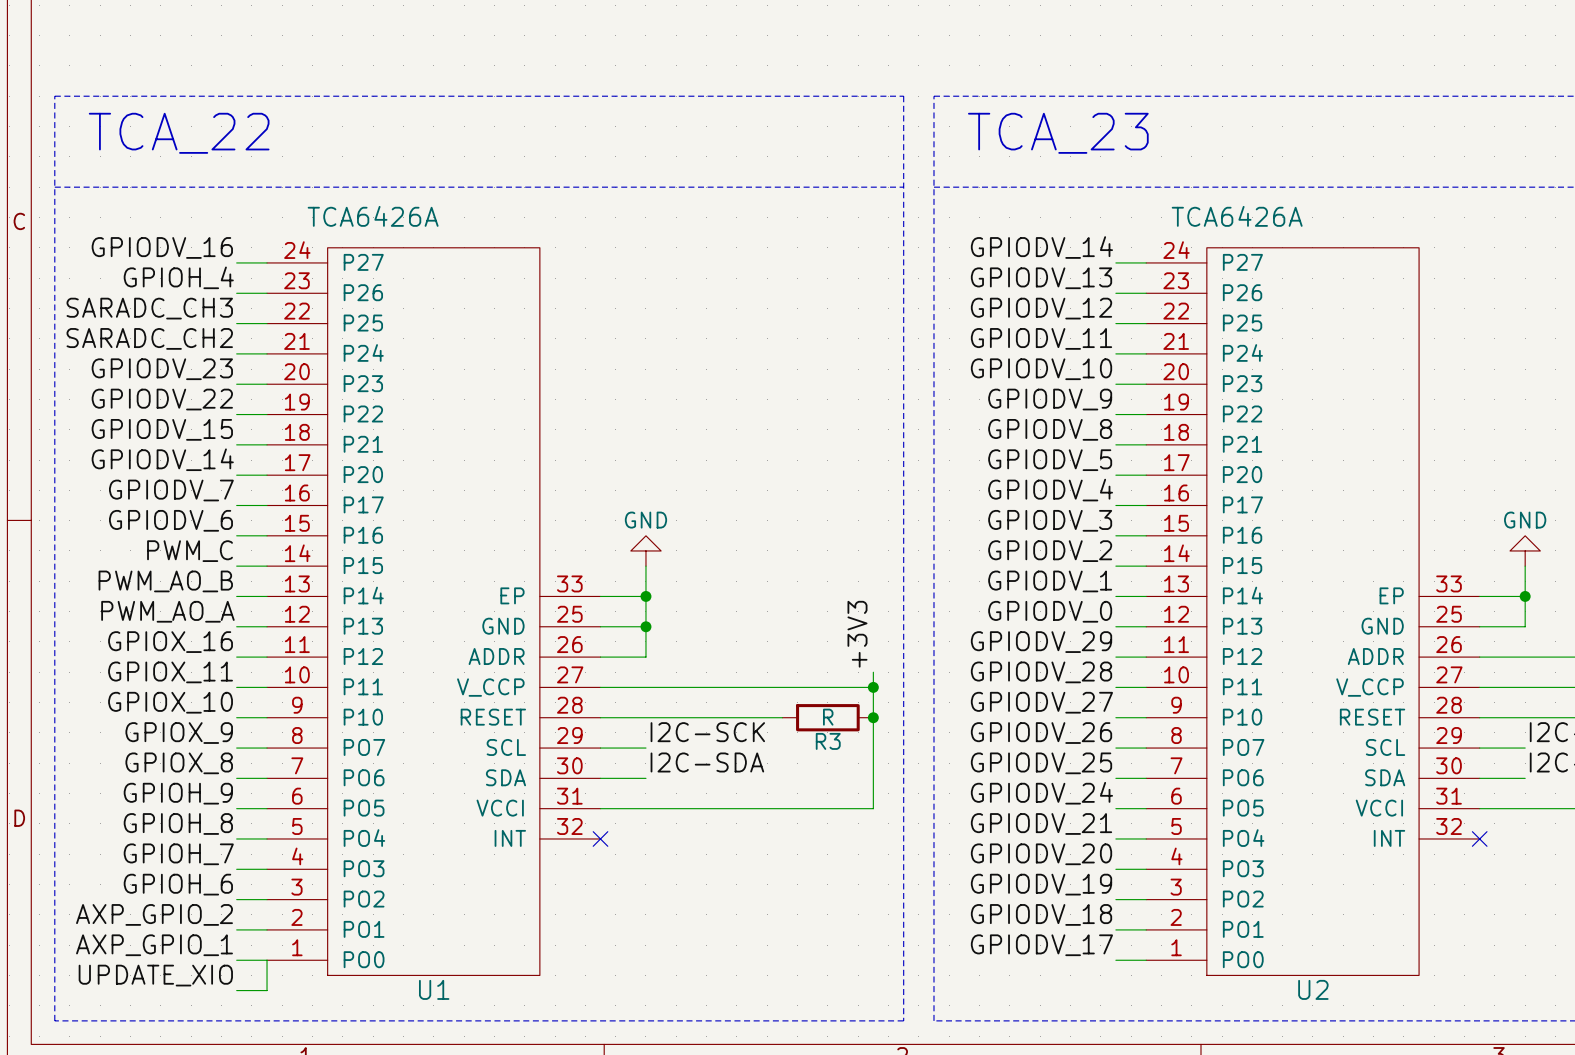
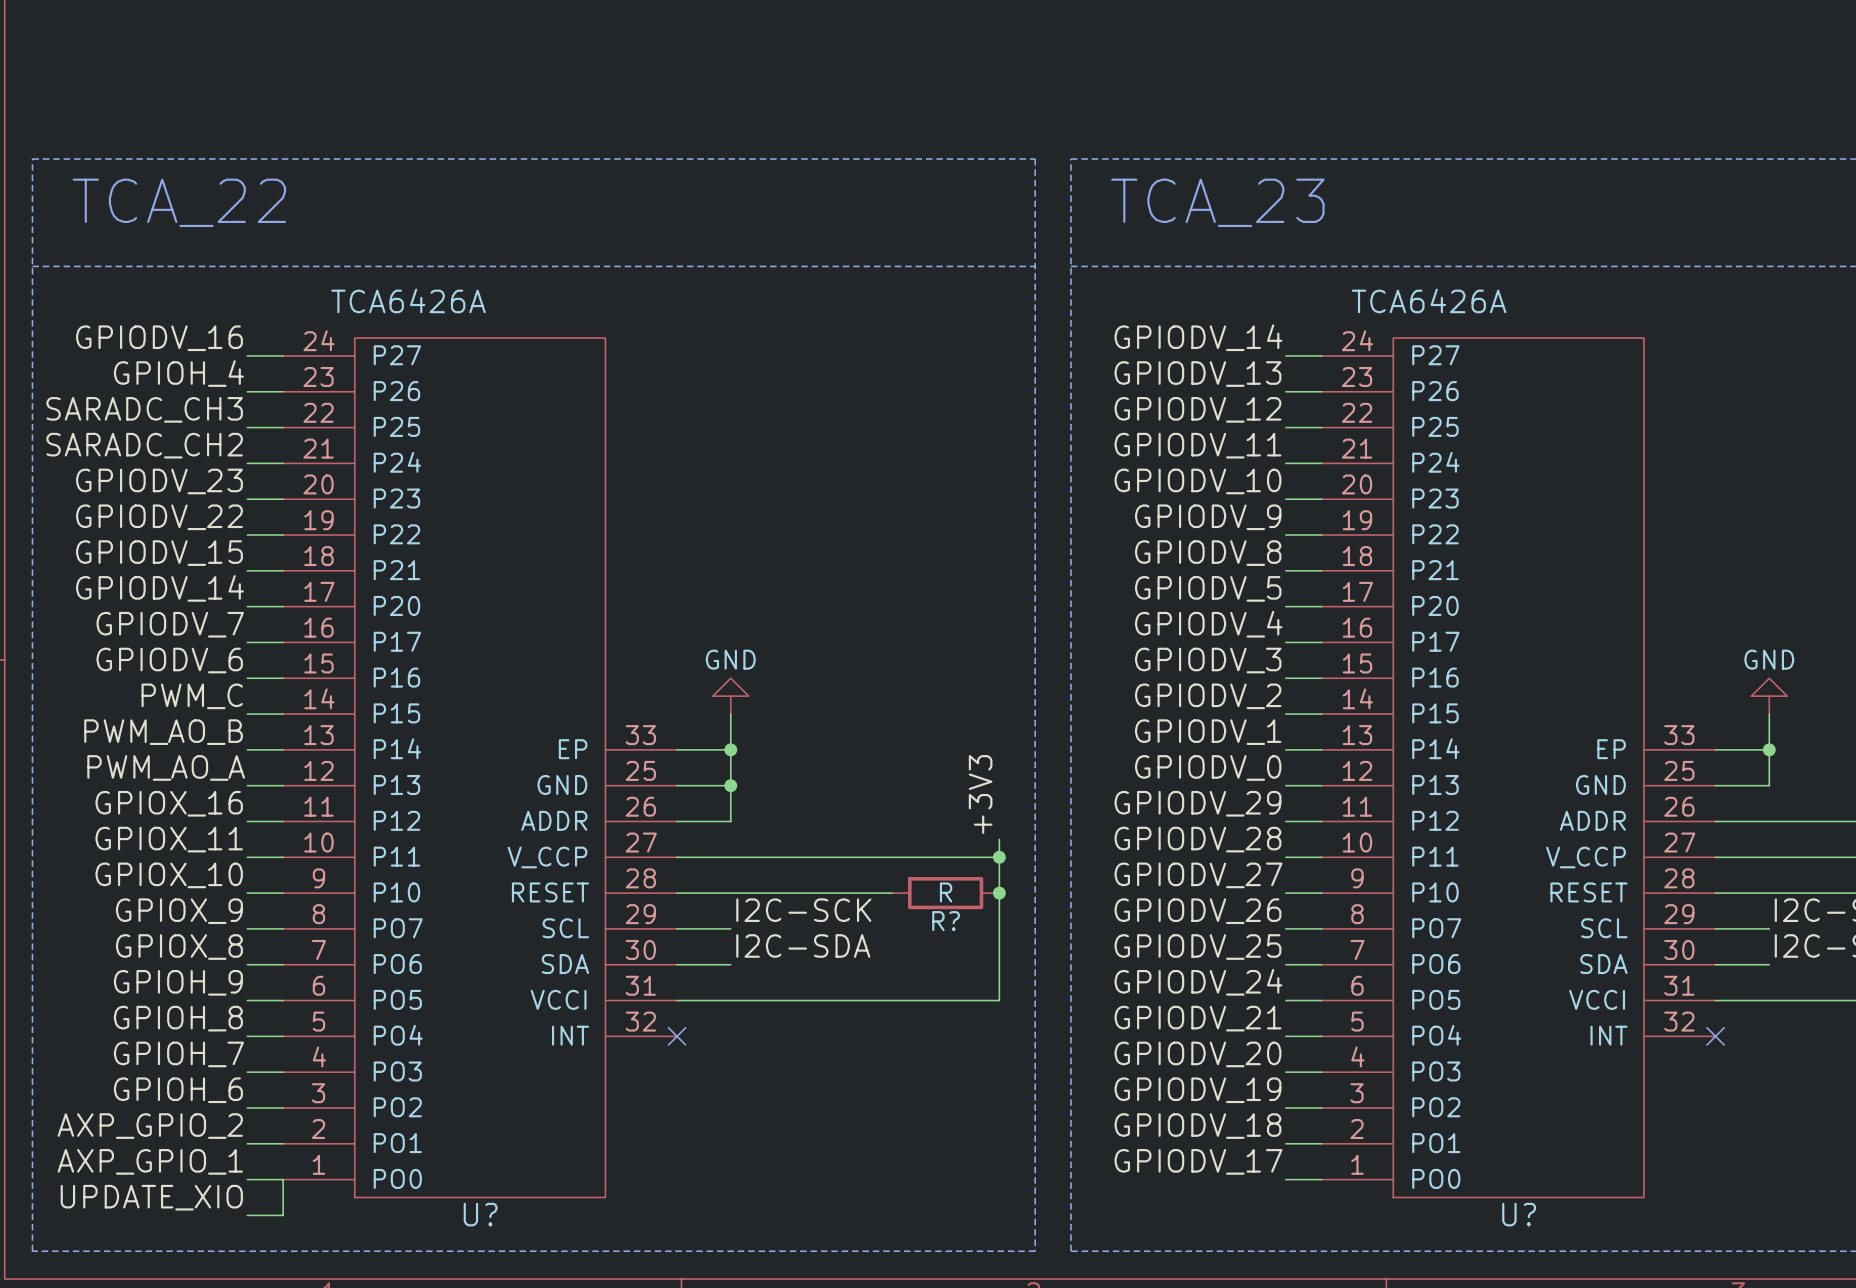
R3 name: R3 (828, 741) -> R? (946, 921)
U1 name: U1 (434, 989) -> U? (480, 1214)
U2 name: U2 (1313, 989) -> U? (1519, 1214)

